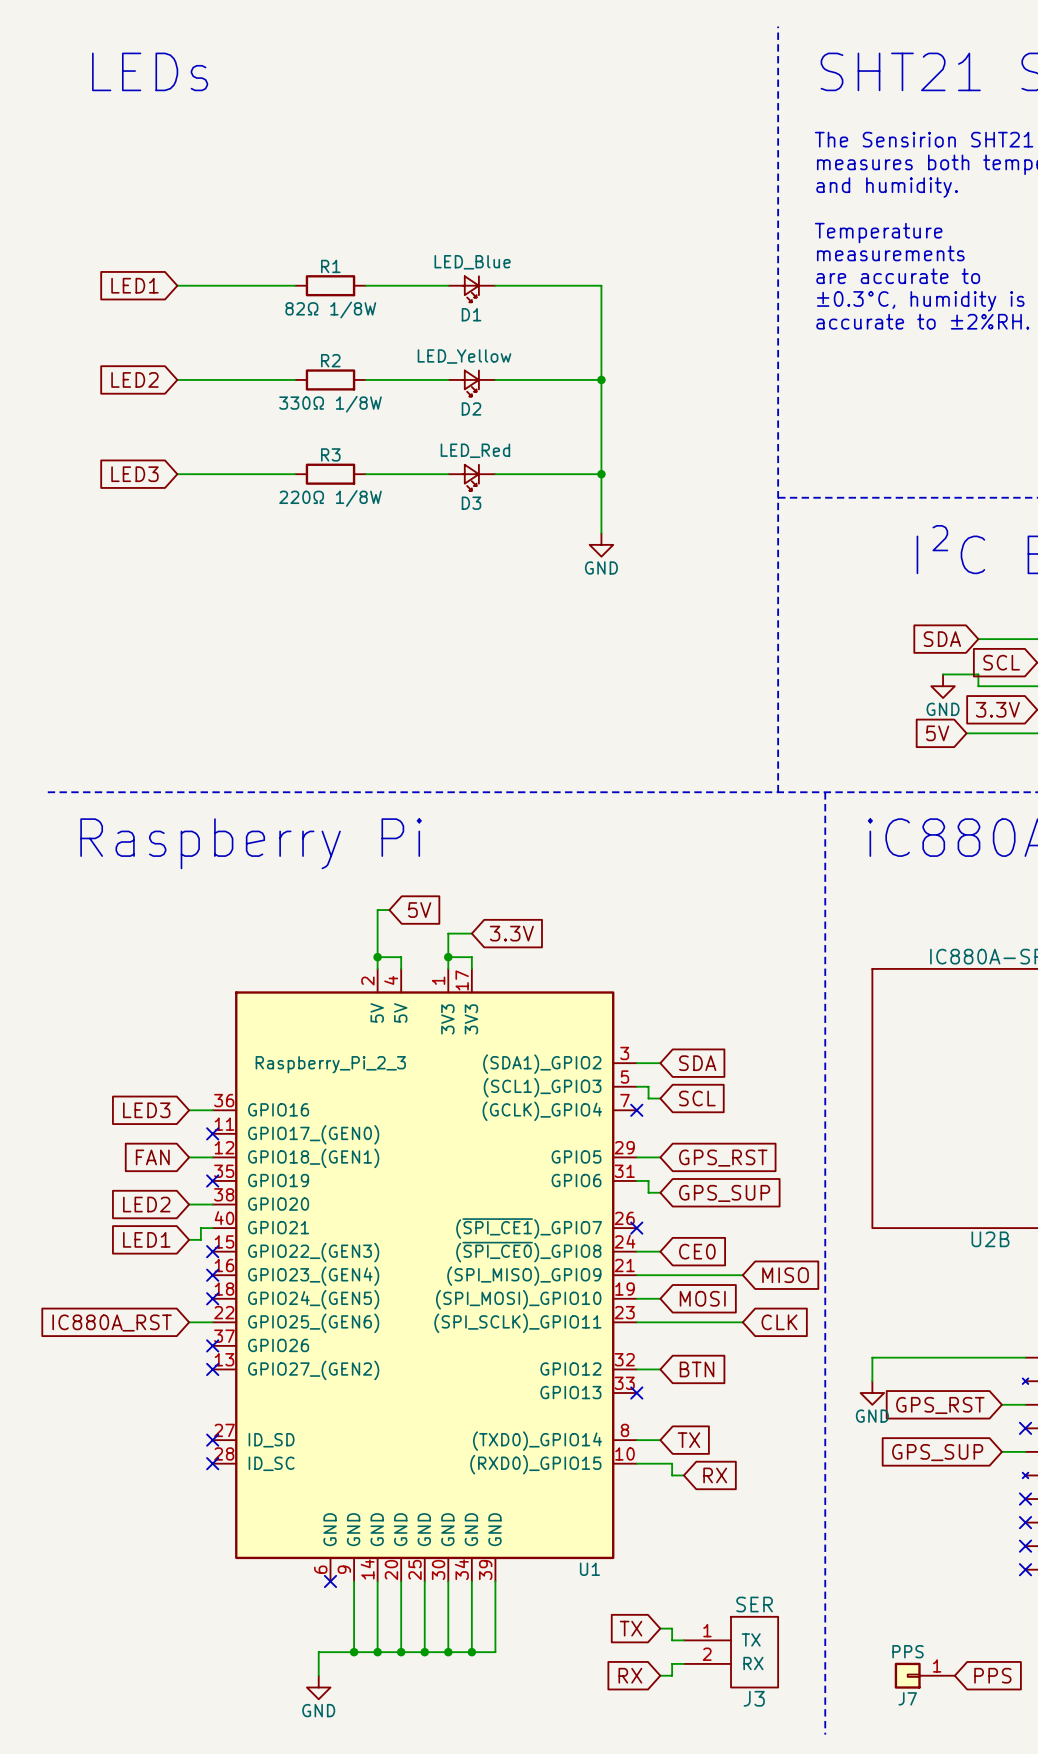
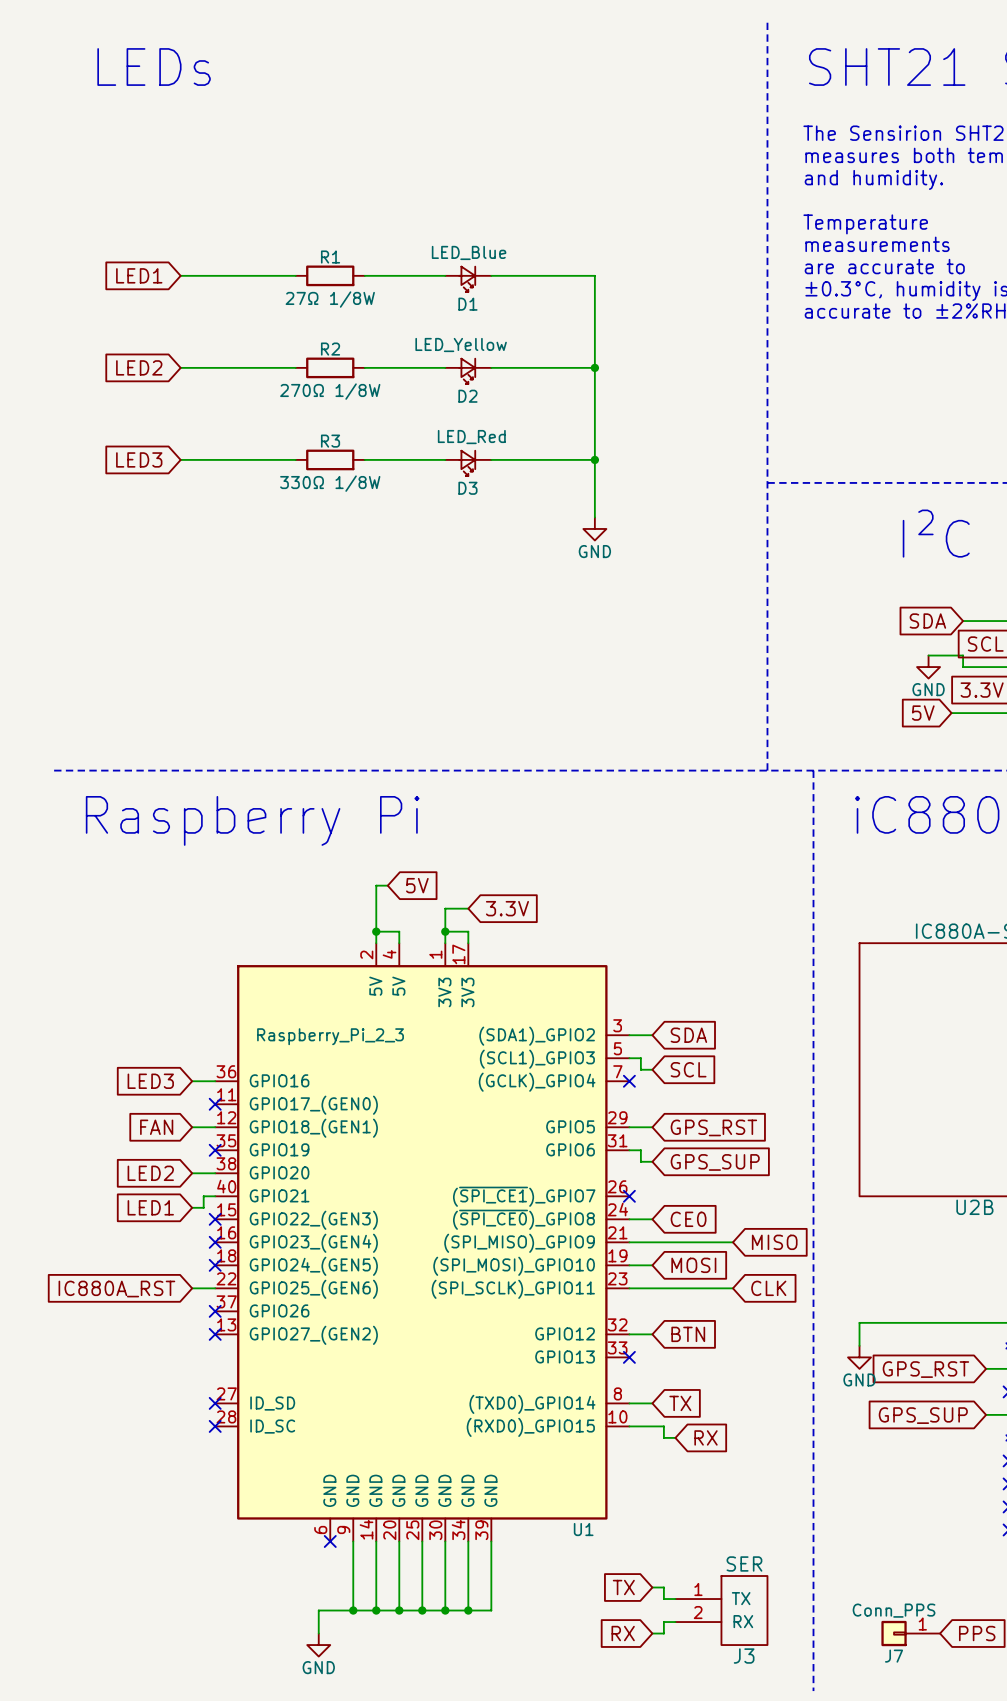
R1 value: 82Ω 1/8W (330, 309) -> 27Ω 1/8W (330, 299)
R2 value: 330Ω 1/8W (330, 404) -> 270Ω 1/8W (330, 391)
R3 value: 220Ω 1/8W (330, 498) -> 330Ω 1/8W (330, 483)
J7 value: PPS (907, 1651) -> Conn_PPS (894, 1610)

